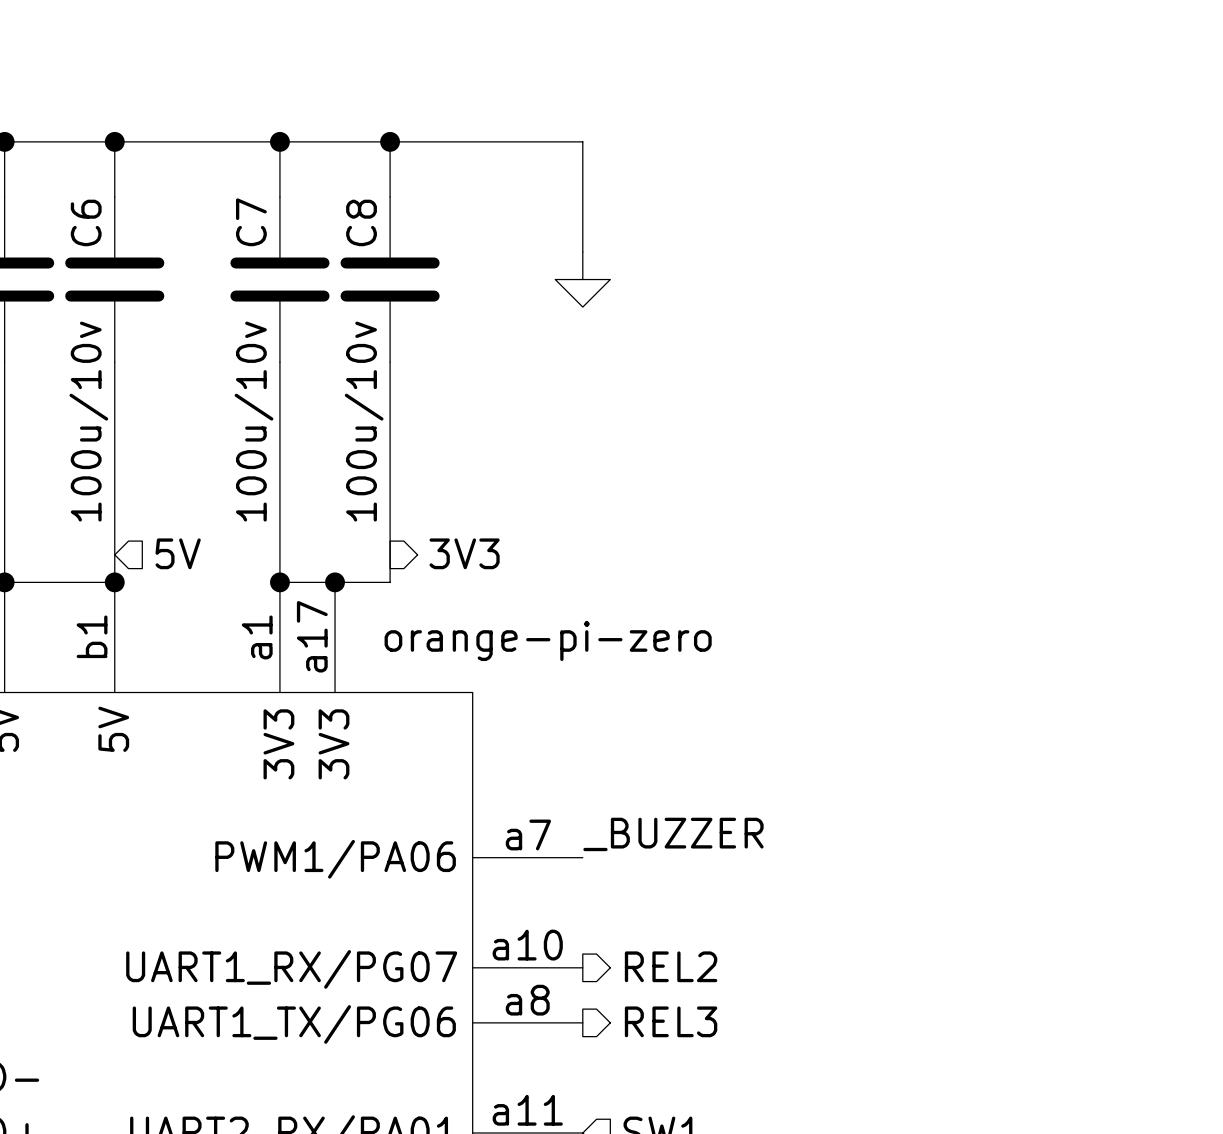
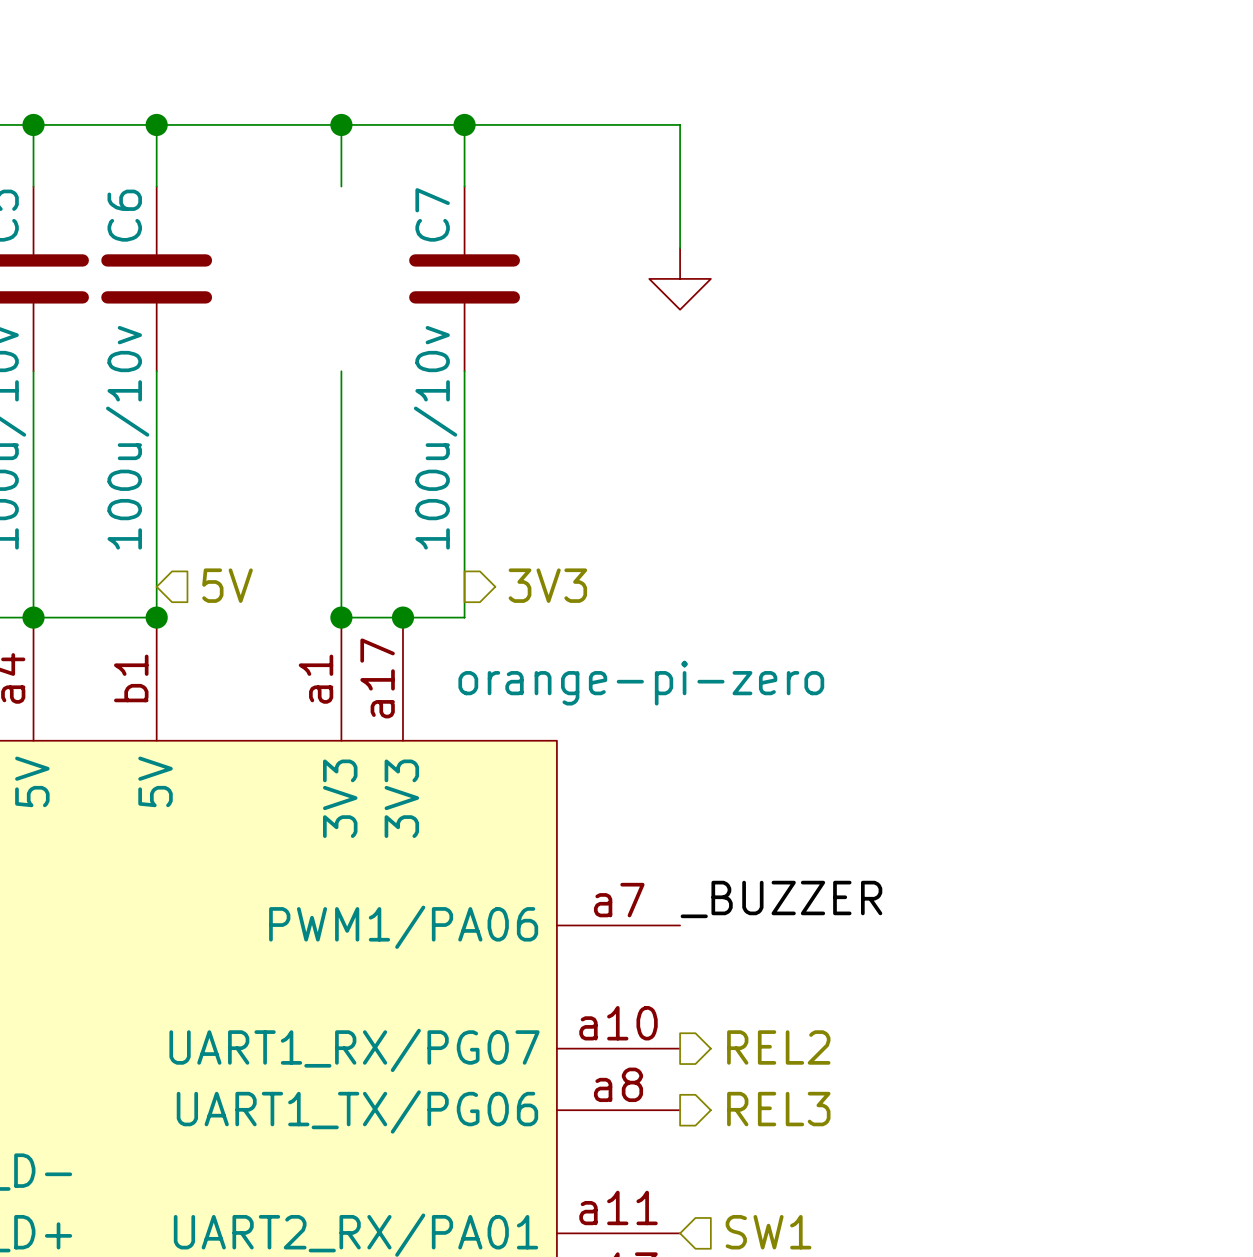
C8 name: C8 (361, 222) -> C7 (432, 214)
C7: 100u/10v (279, 279) -> none

